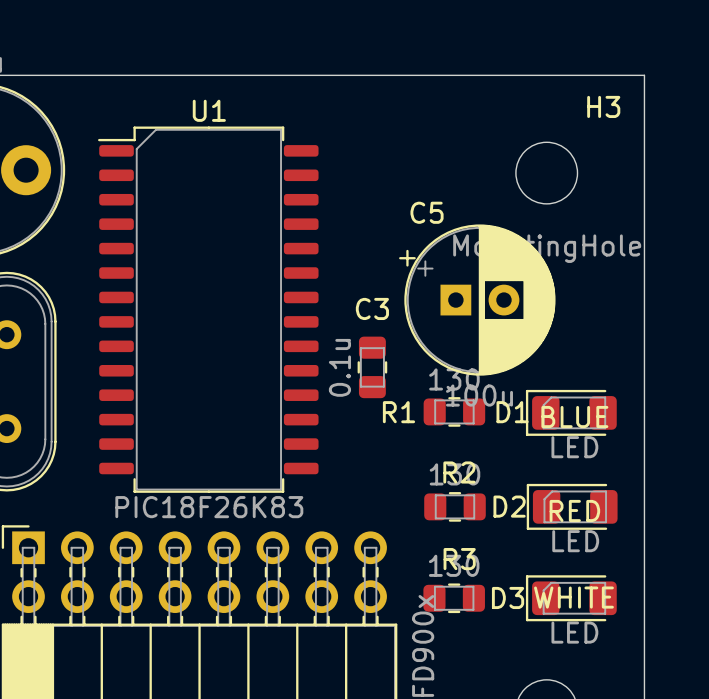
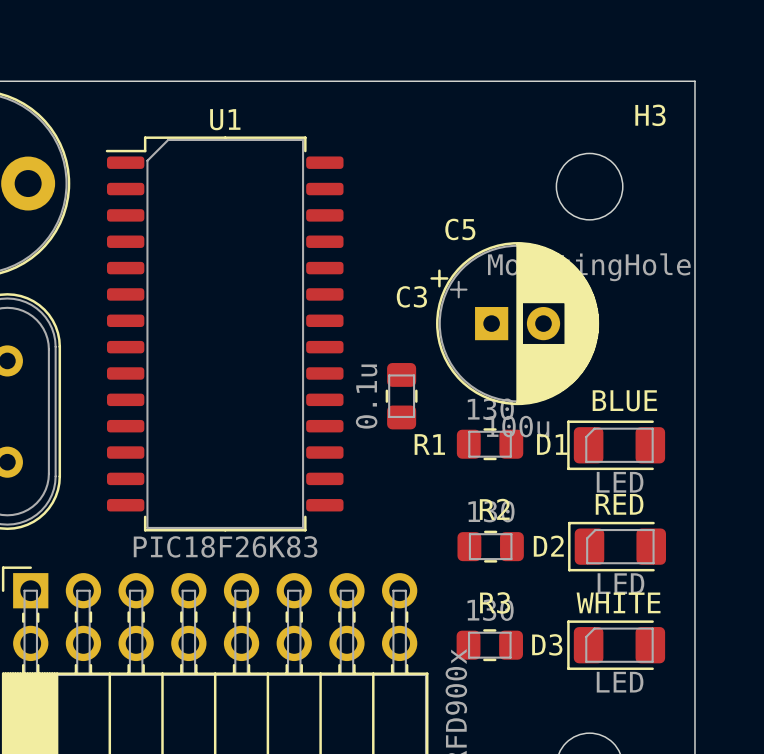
C3 name position: C3 (372, 308) -> C3 (411, 296)
text position: BLUE (574, 416) -> BLUE (624, 400)
text position: RED (574, 510) -> RED (619, 504)
text position: WHITE (573, 597) -> WHITE (618, 602)

